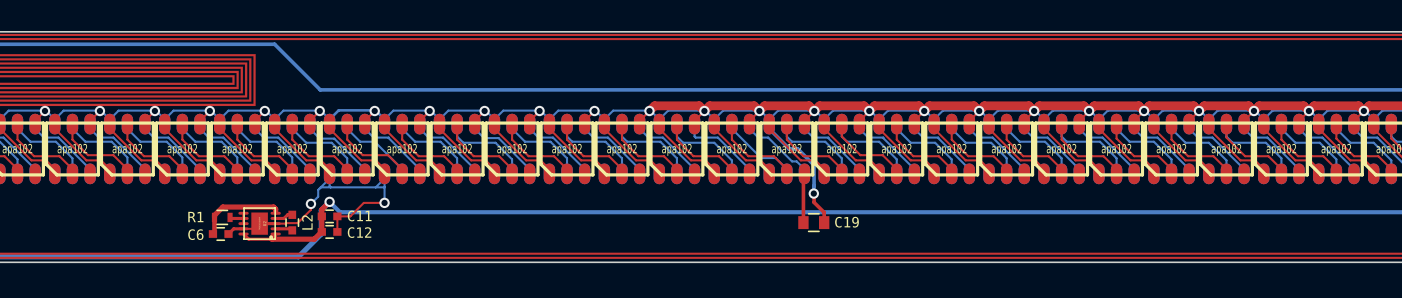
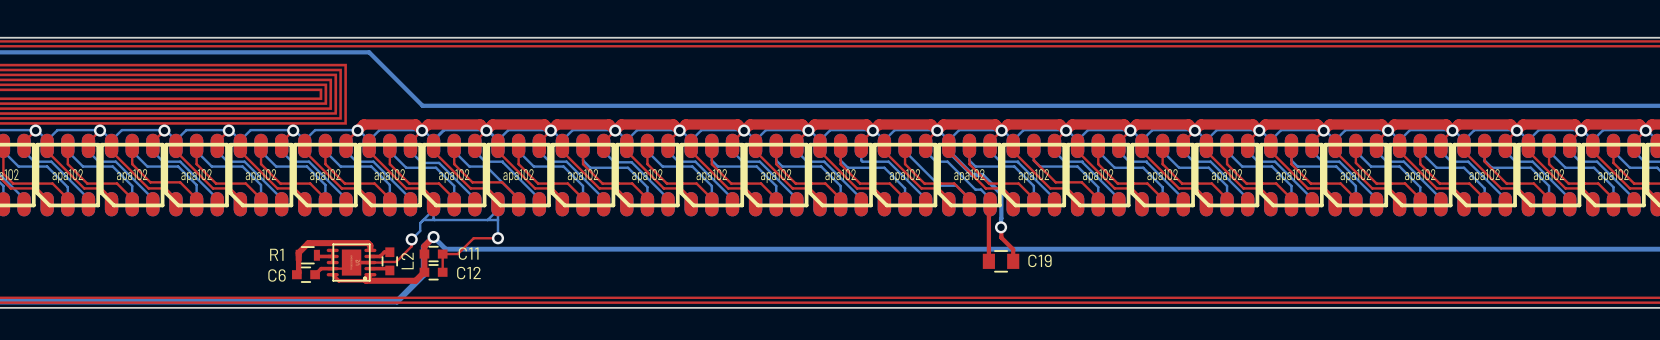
top track: none -> (357, 130) (363, 124) (415, 124) (422, 130) (428, 124) (480, 124) (486, 130) (492, 124) (544, 124) (550, 130) (556, 124) (609, 124) (615, 130) (621, 124) (673, 124) (679, 130) (685, 124) (737, 124) (744, 130) (750, 124) (802, 124) (808, 130)

